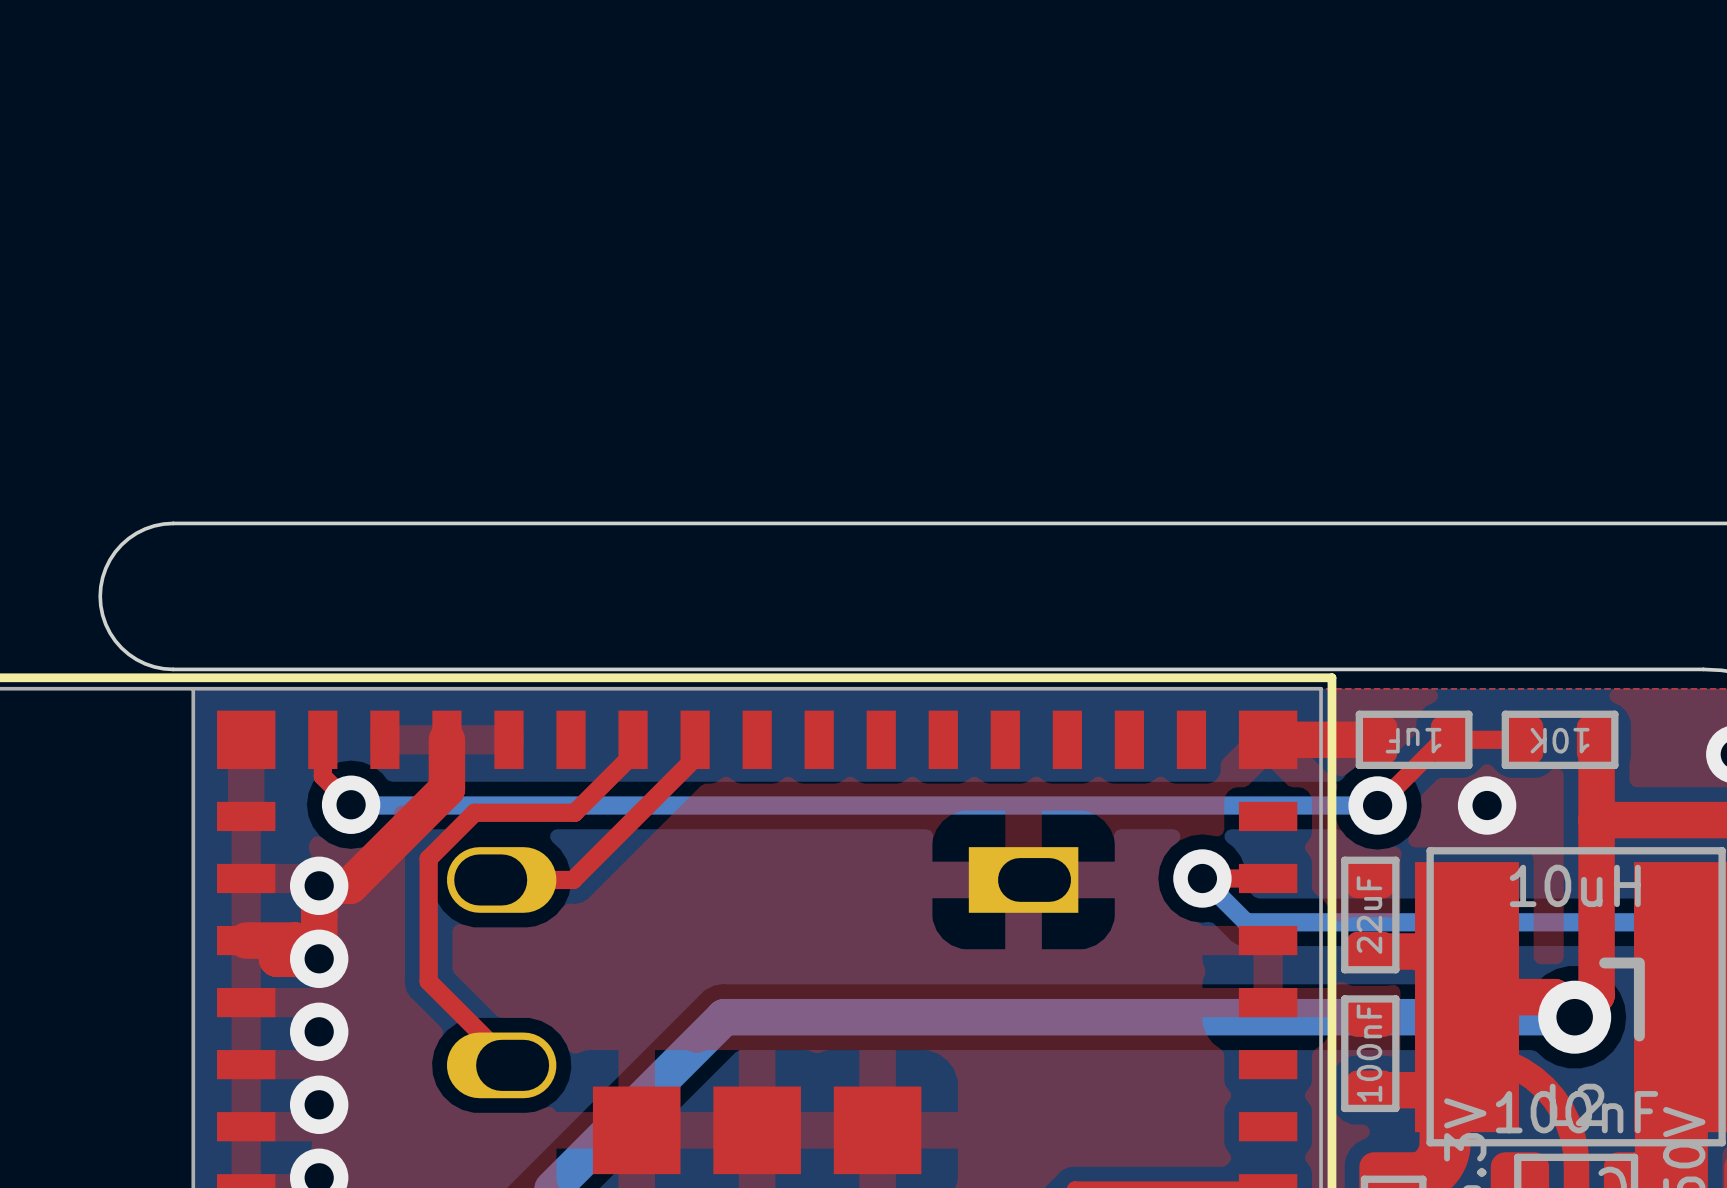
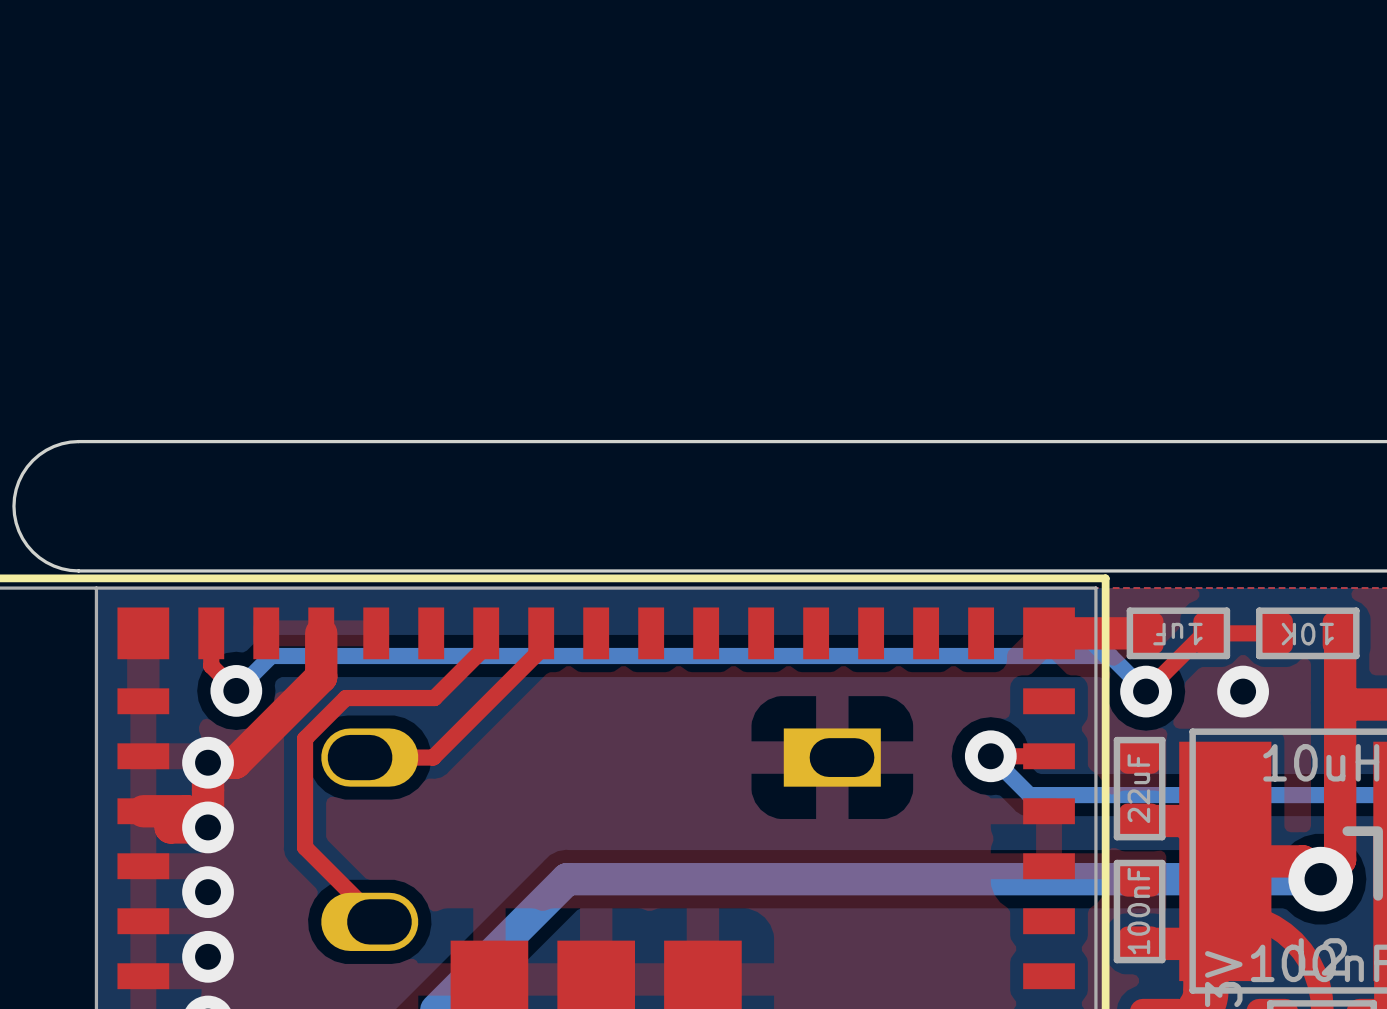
bottom track: (351, 805) (1377, 805) -> (236, 690) (271, 656) (1110, 656) (1146, 691)

